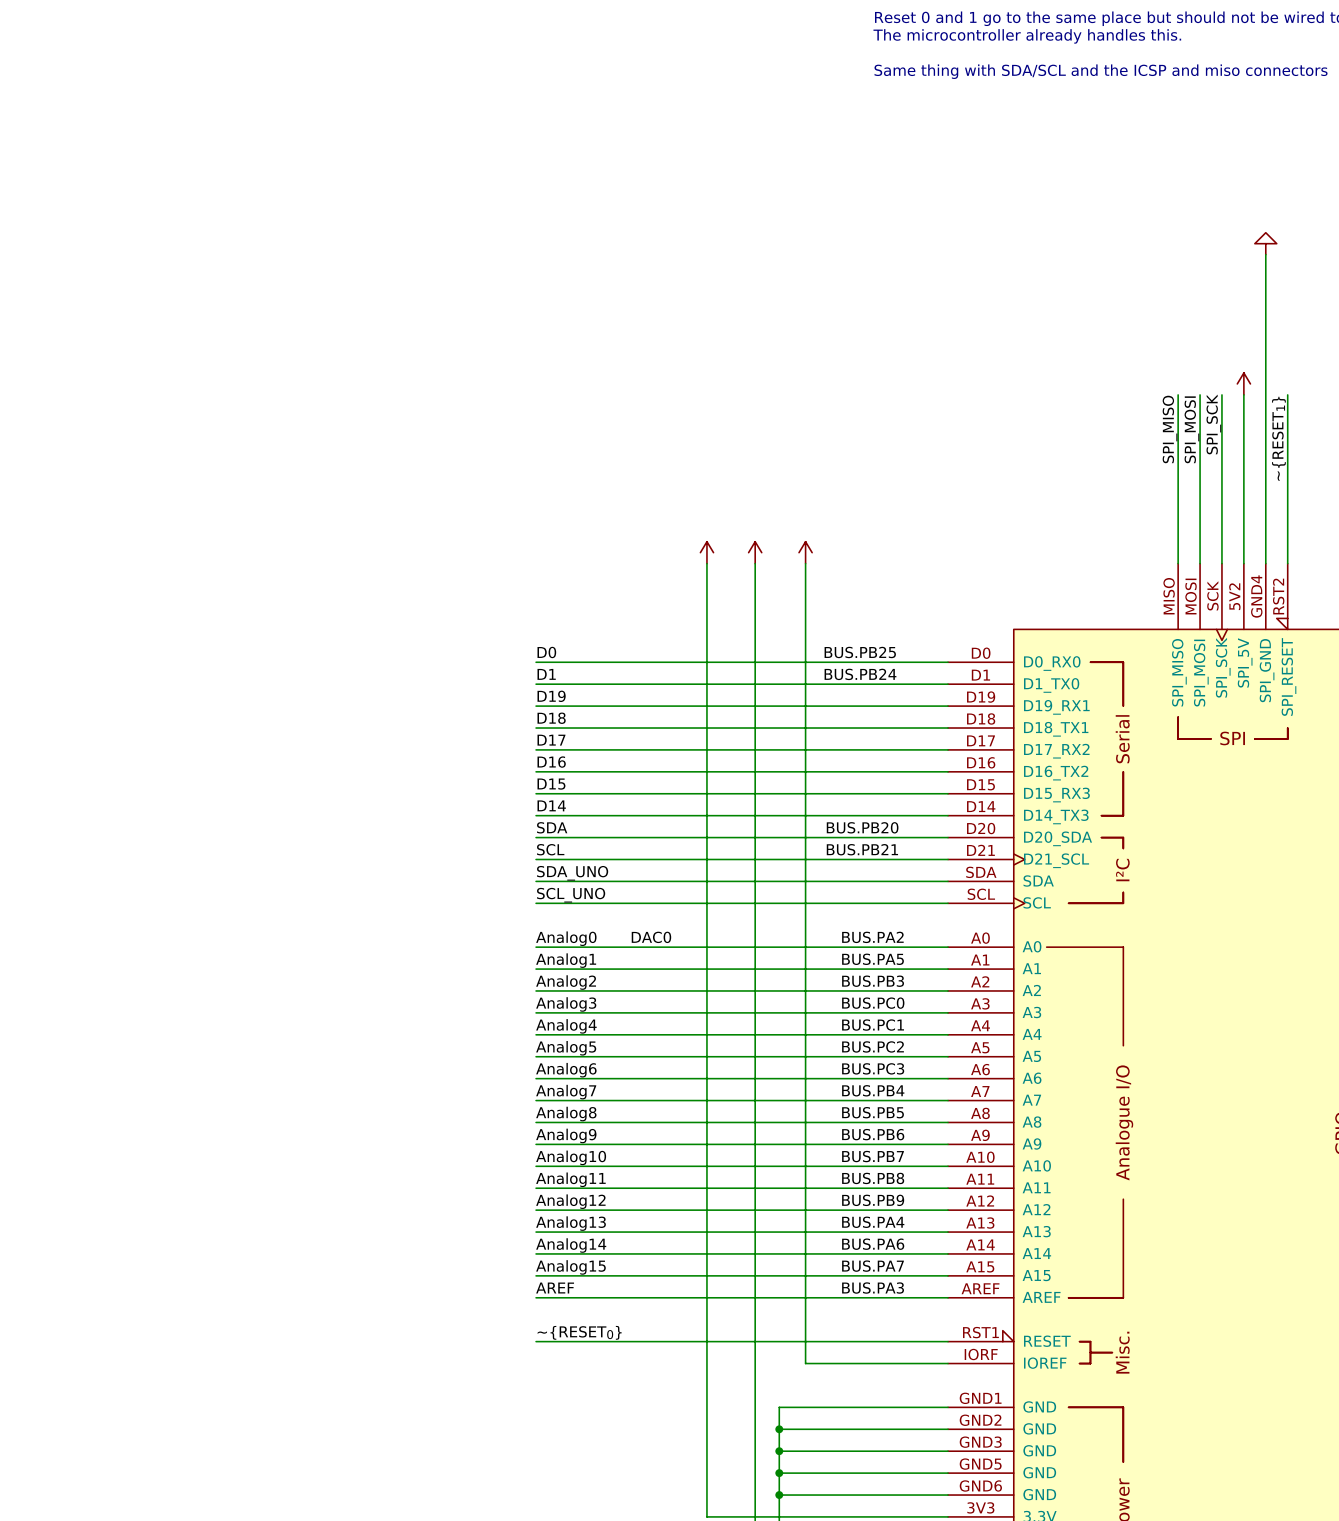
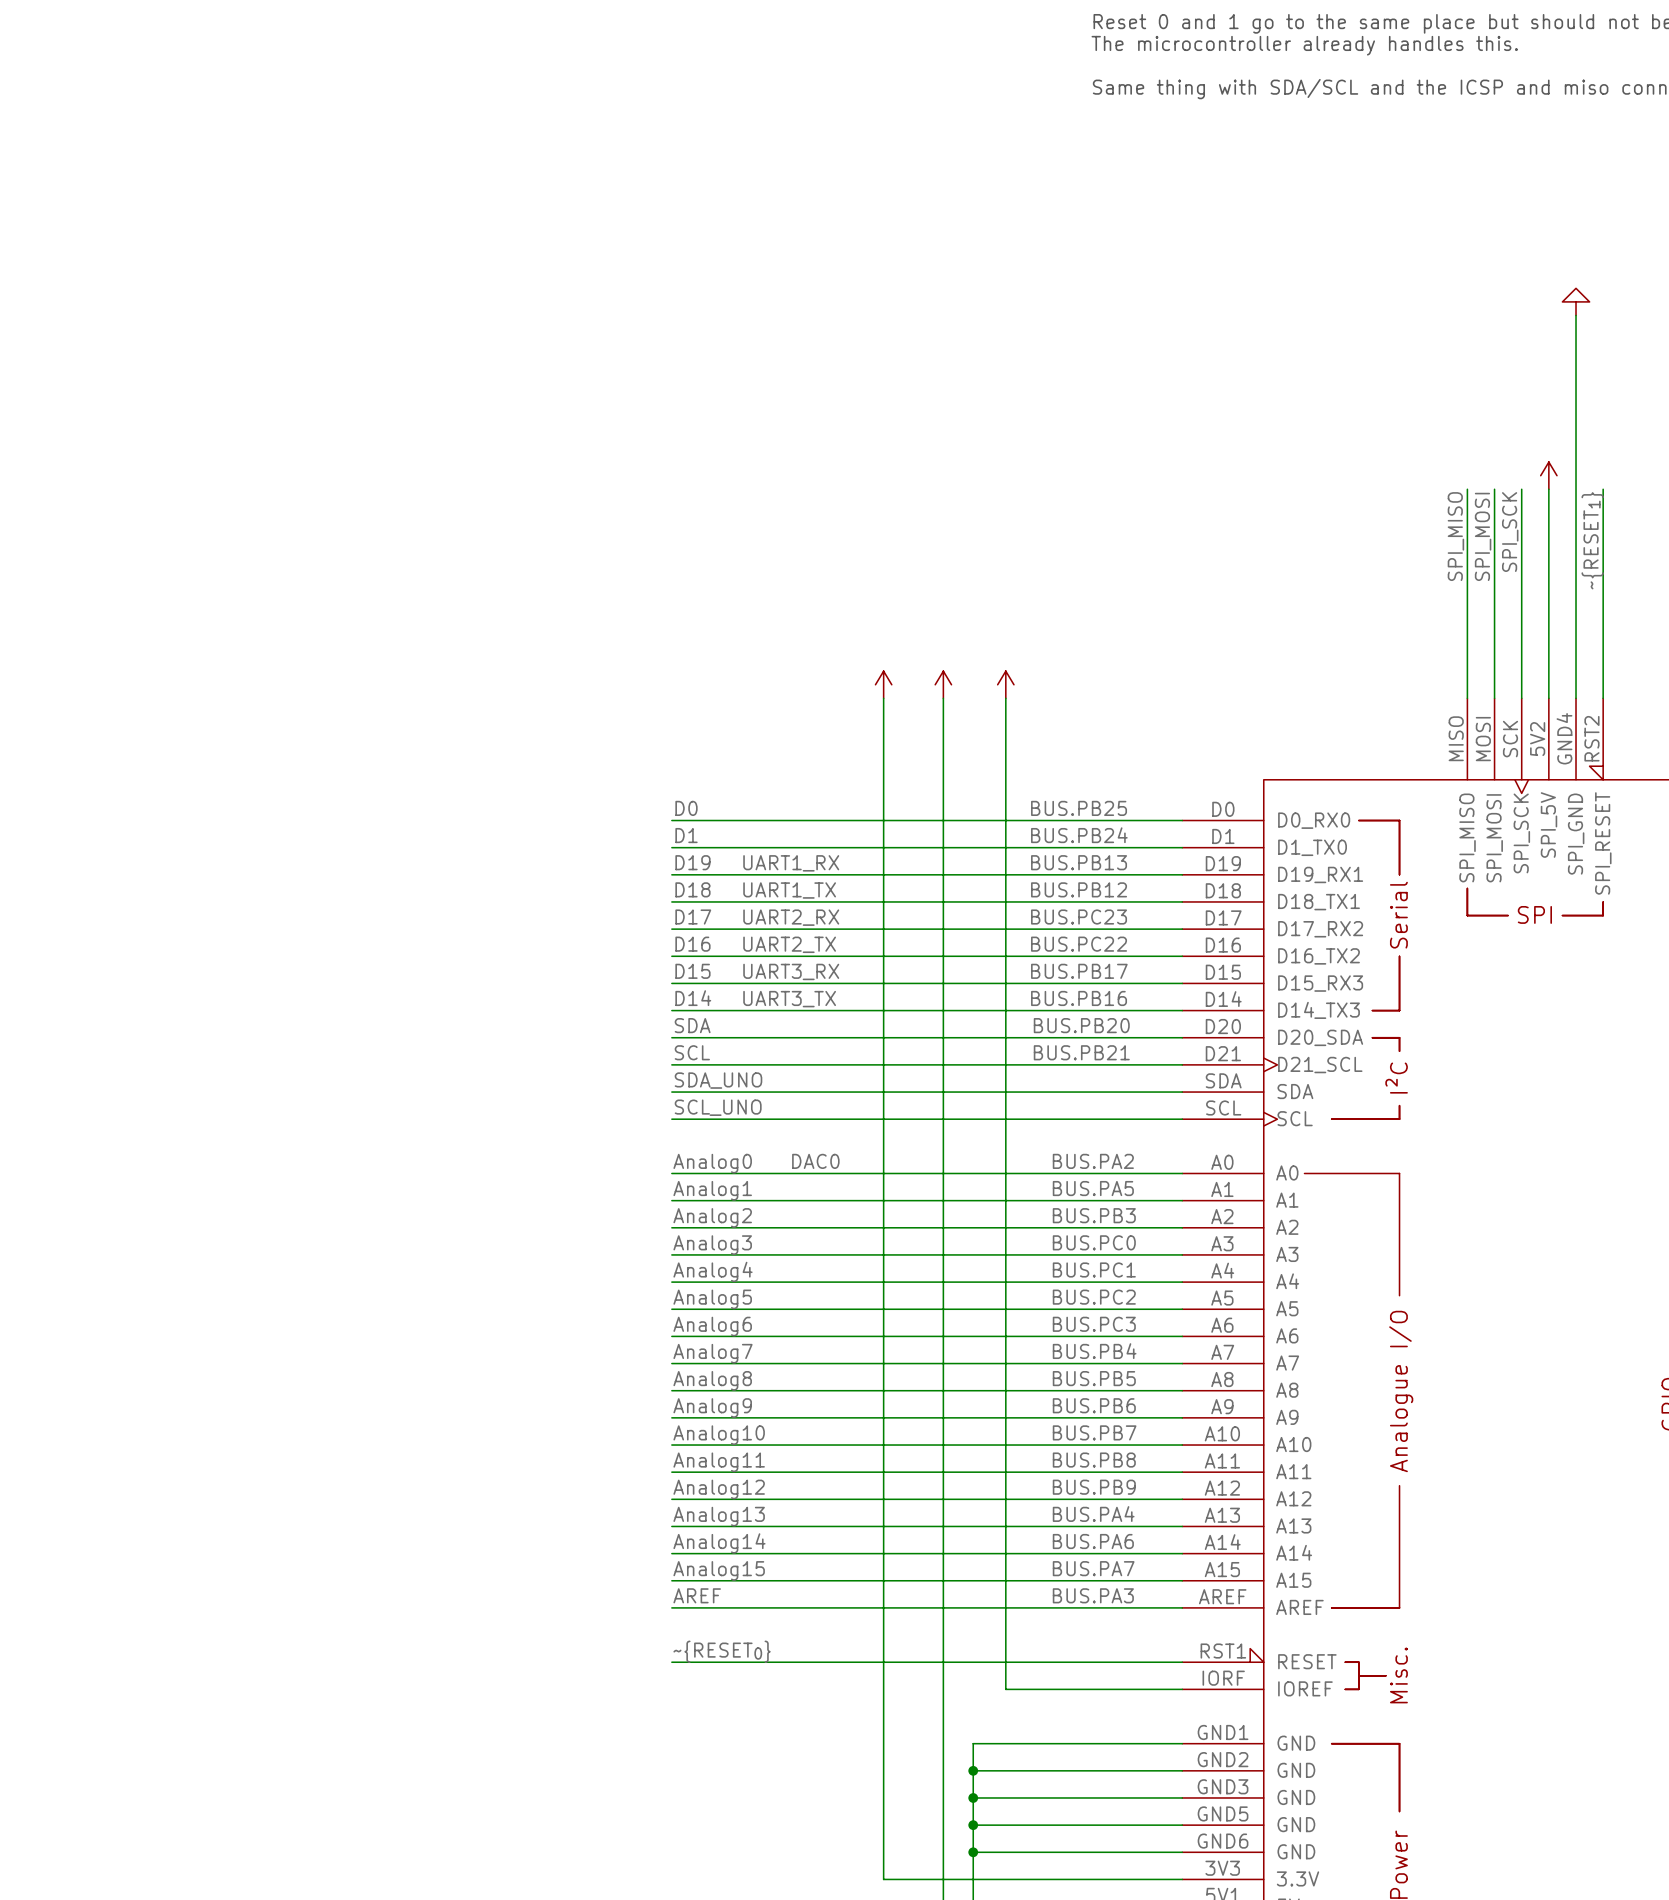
label: none -> BUS.PB13 (1079, 862)
label: none -> UART1_RX (791, 863)
label: none -> BUS.PB12 (1079, 889)
label: none -> UART1_TX (789, 890)
label: none -> BUS.PC23 (1079, 917)
label: none -> UART2_RX (791, 917)
label: none -> BUS.PC22 (1079, 944)
label: none -> UART2_TX (789, 944)
label: none -> BUS.PB17 (1079, 971)
label: none -> UART3_RX (791, 971)
label: none -> BUS.PB16 (1079, 998)
label: none -> UART3_TX (789, 999)

